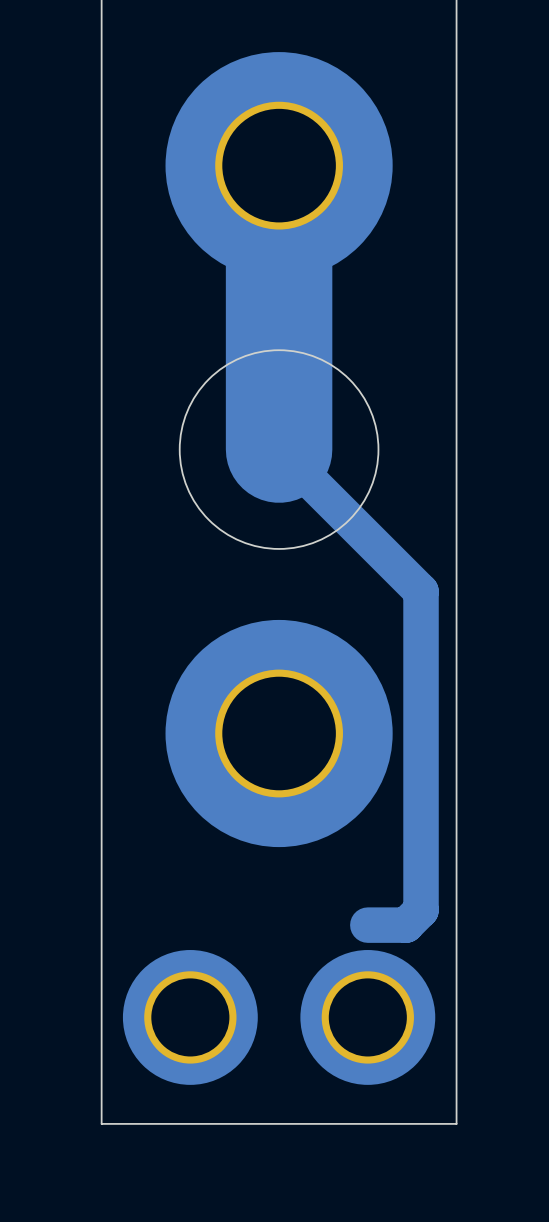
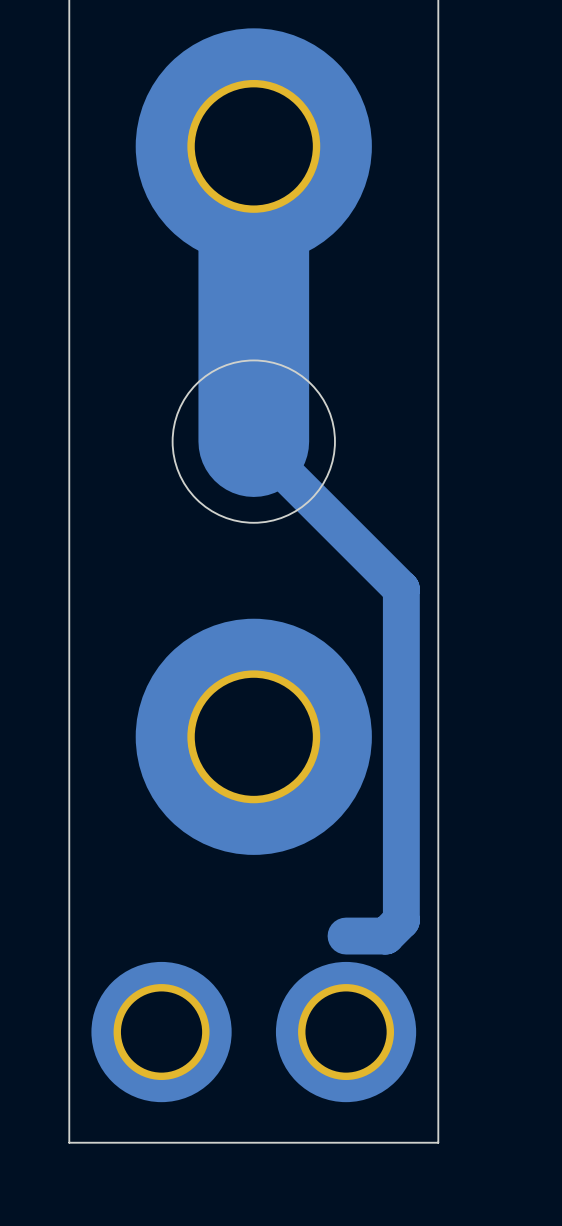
round board edge size: [178, 349, 380, 550] -> [171, 359, 336, 524]

